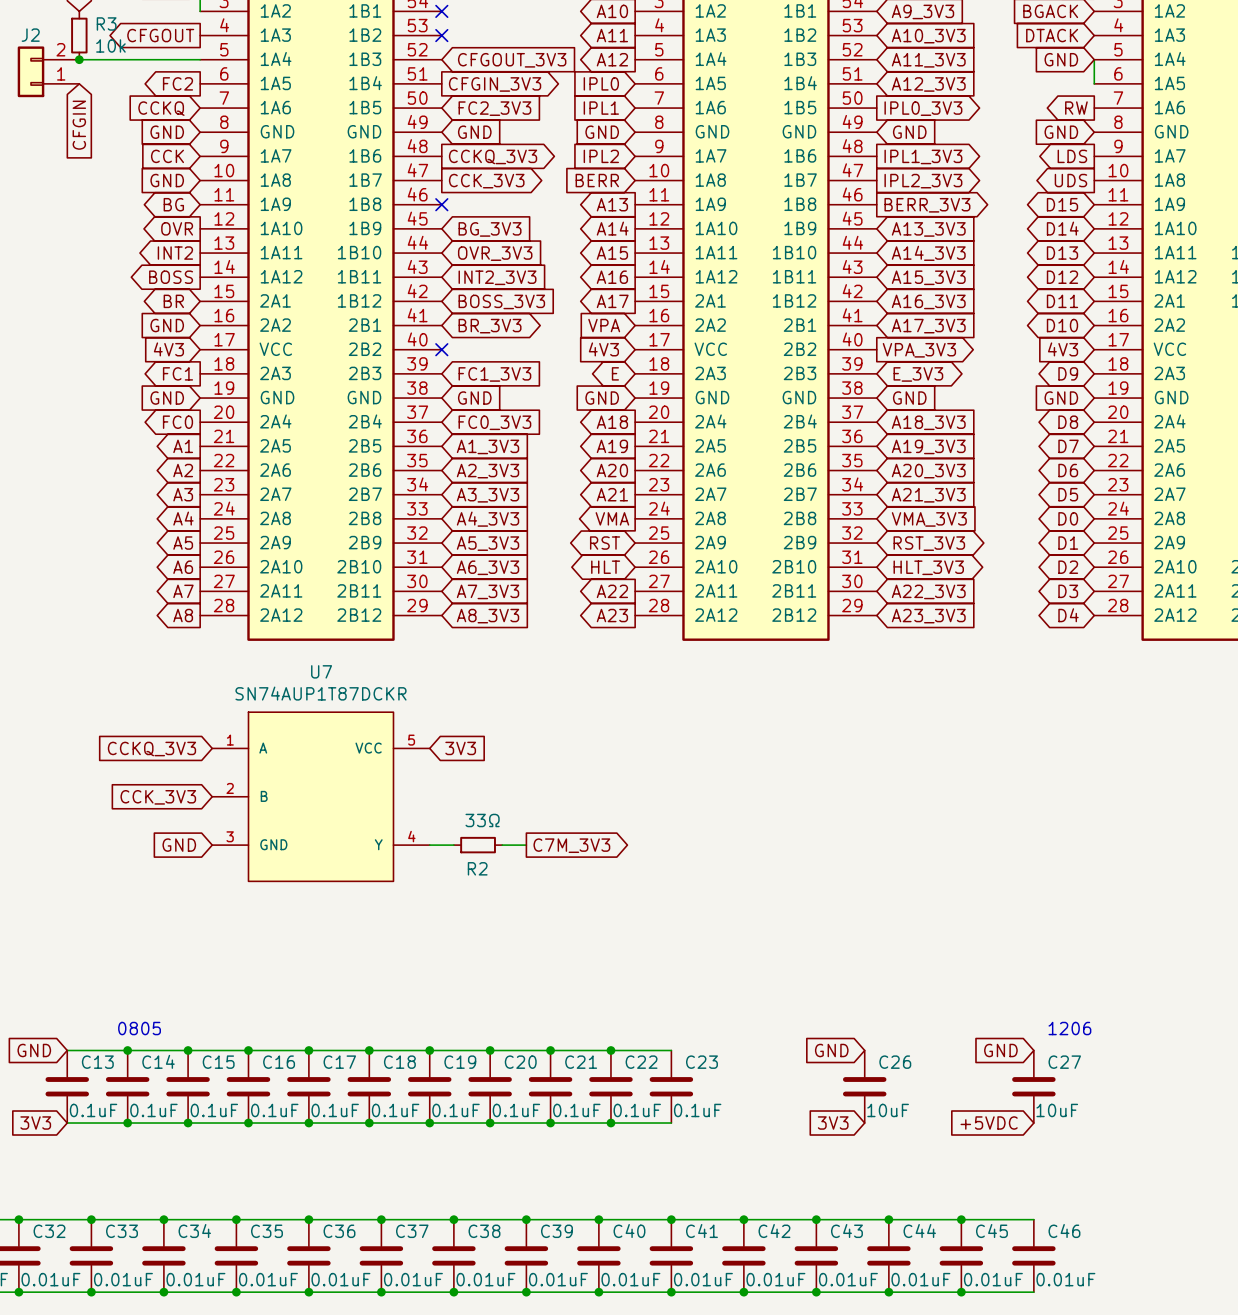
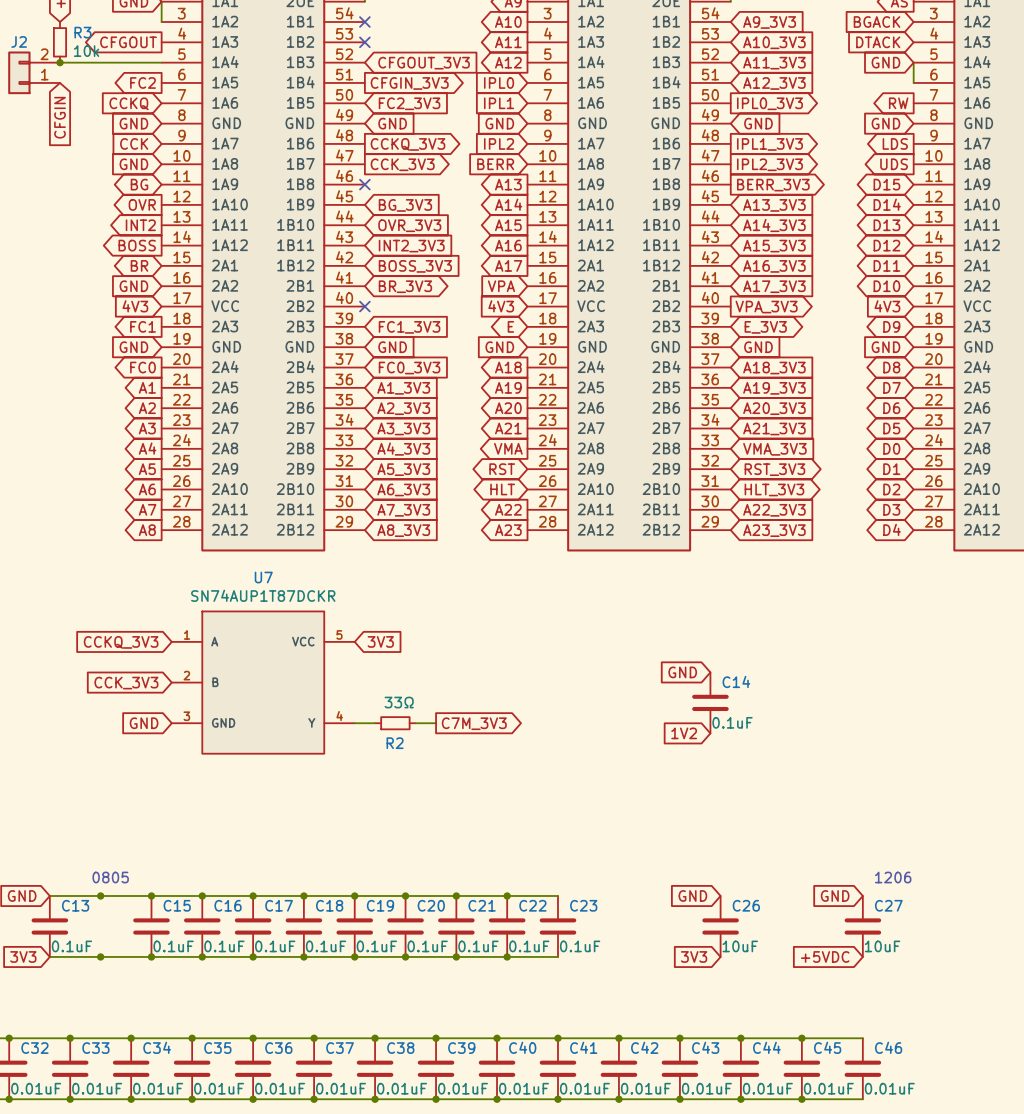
global label: none -> GND (682, 672)
global label: none -> 1V2 (684, 733)
C14 position: (127, 1086) -> (710, 702)

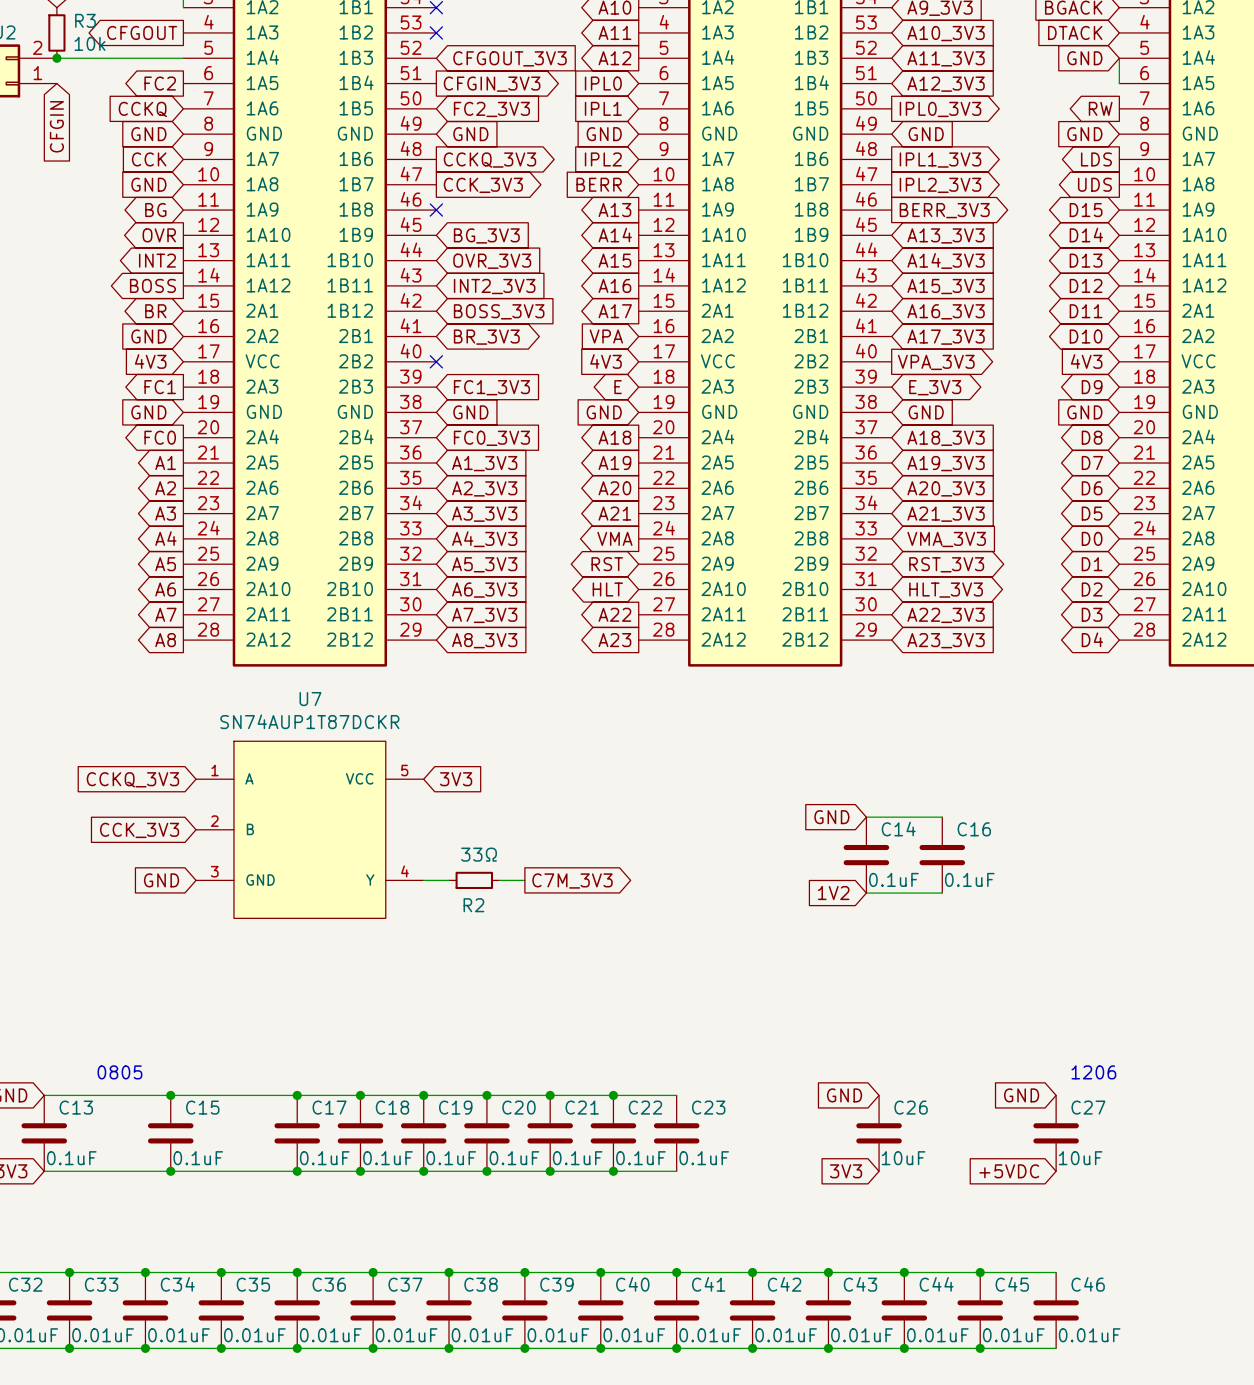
wire: none -> (866, 817) (942, 817)
wire: none -> (866, 893) (942, 893)
junction: (100, 896) -> none
junction: (202, 896) -> none
C16 position: (202, 926) -> (942, 855)
junction: (100, 956) -> none
junction: (202, 956) -> none

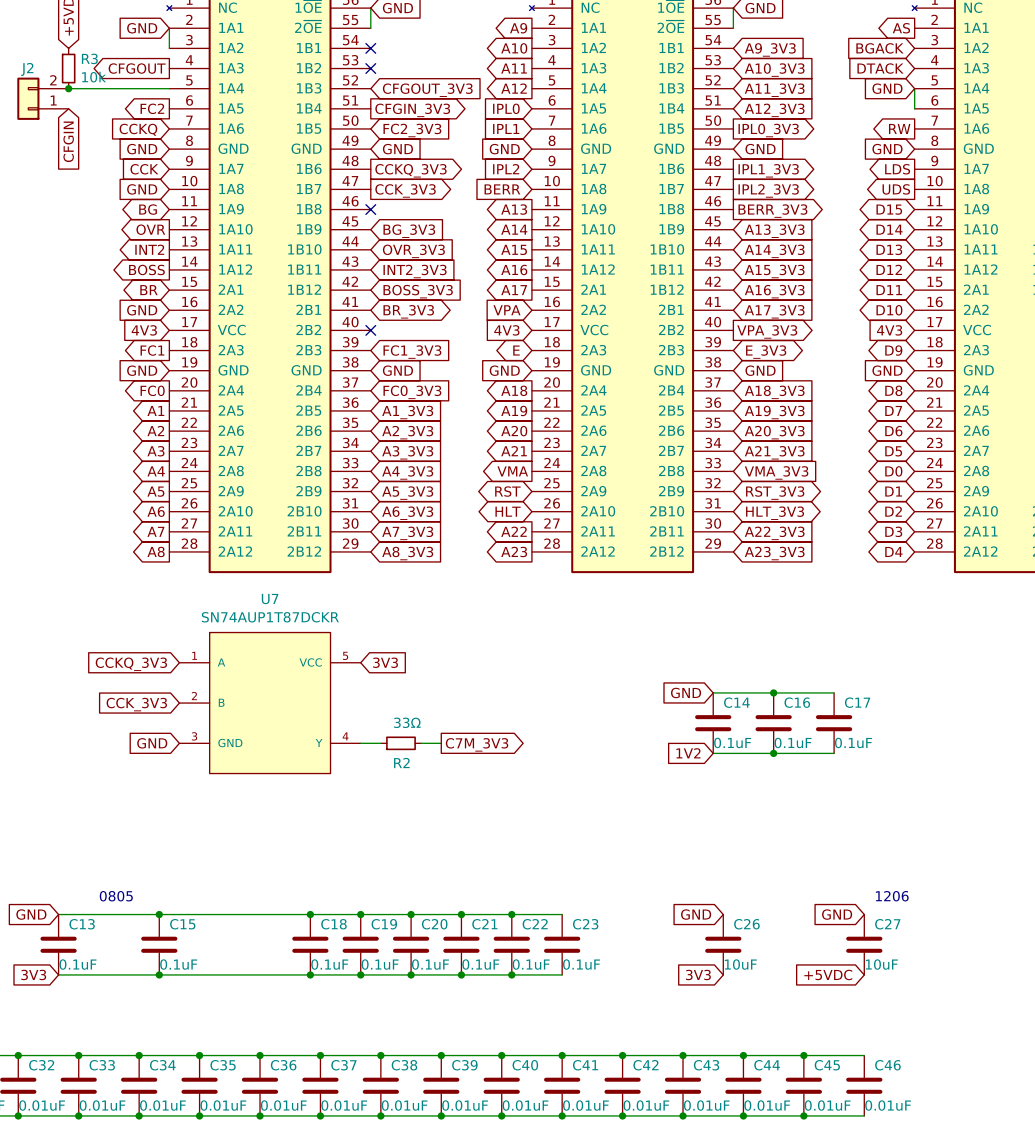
wire: none -> (773, 692) (834, 692)
junction: none -> (773, 692)
wire: none -> (773, 753) (834, 753)
junction: none -> (773, 753)
junction: (297, 1095) -> none
C17 position: (297, 1133) -> (834, 723)
junction: (297, 1171) -> none

